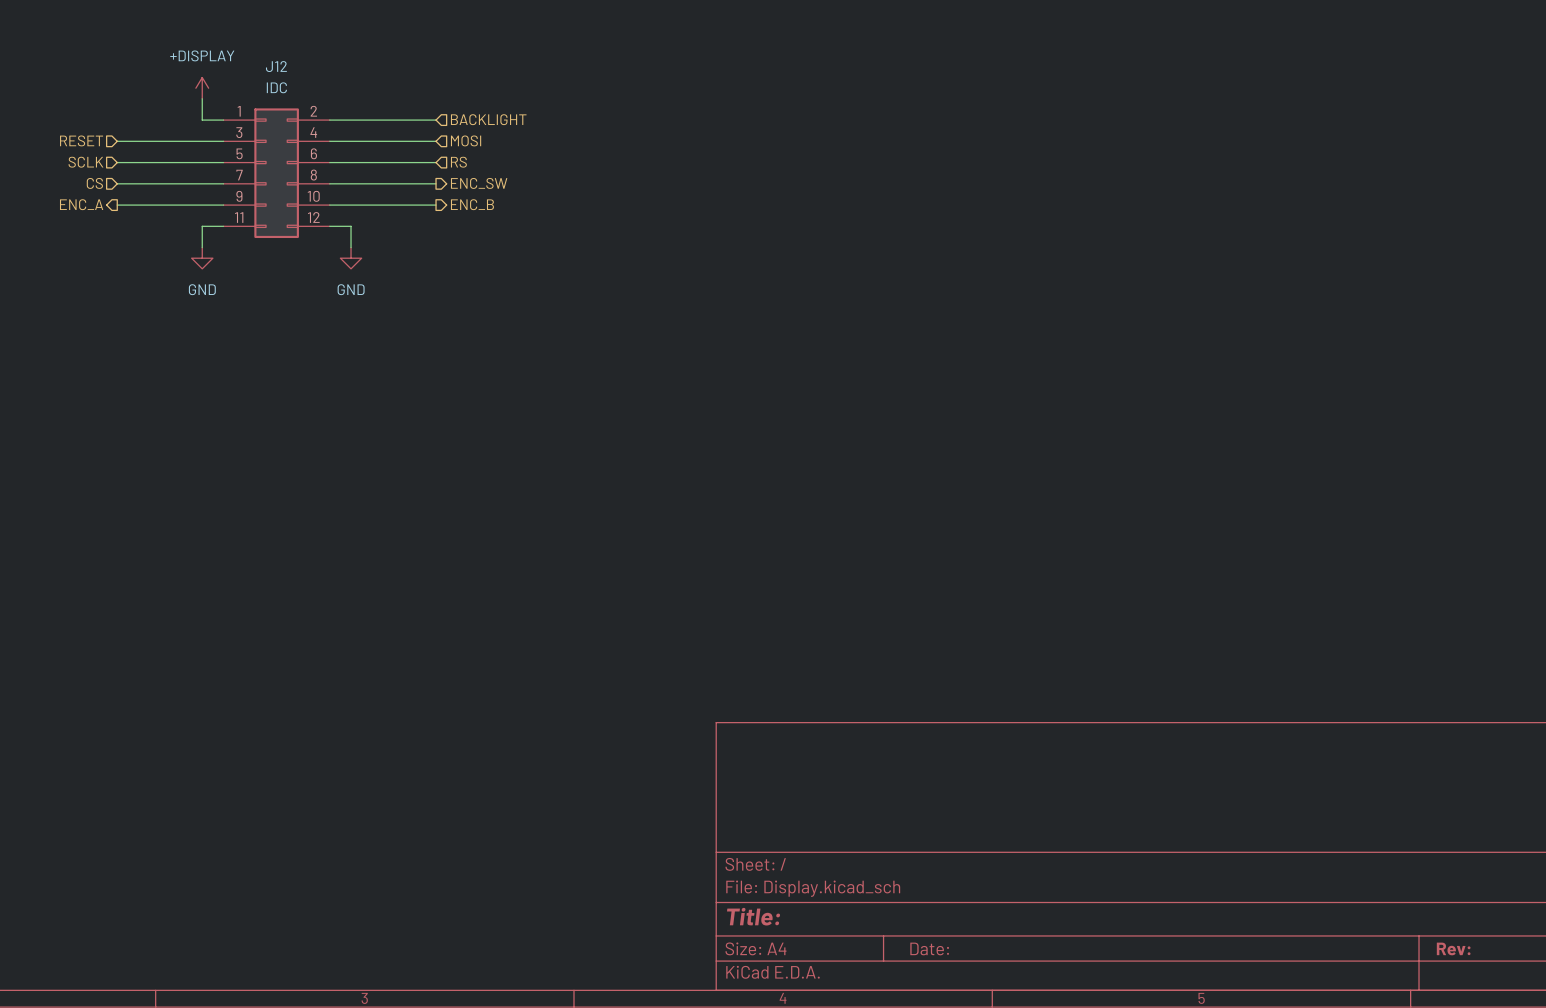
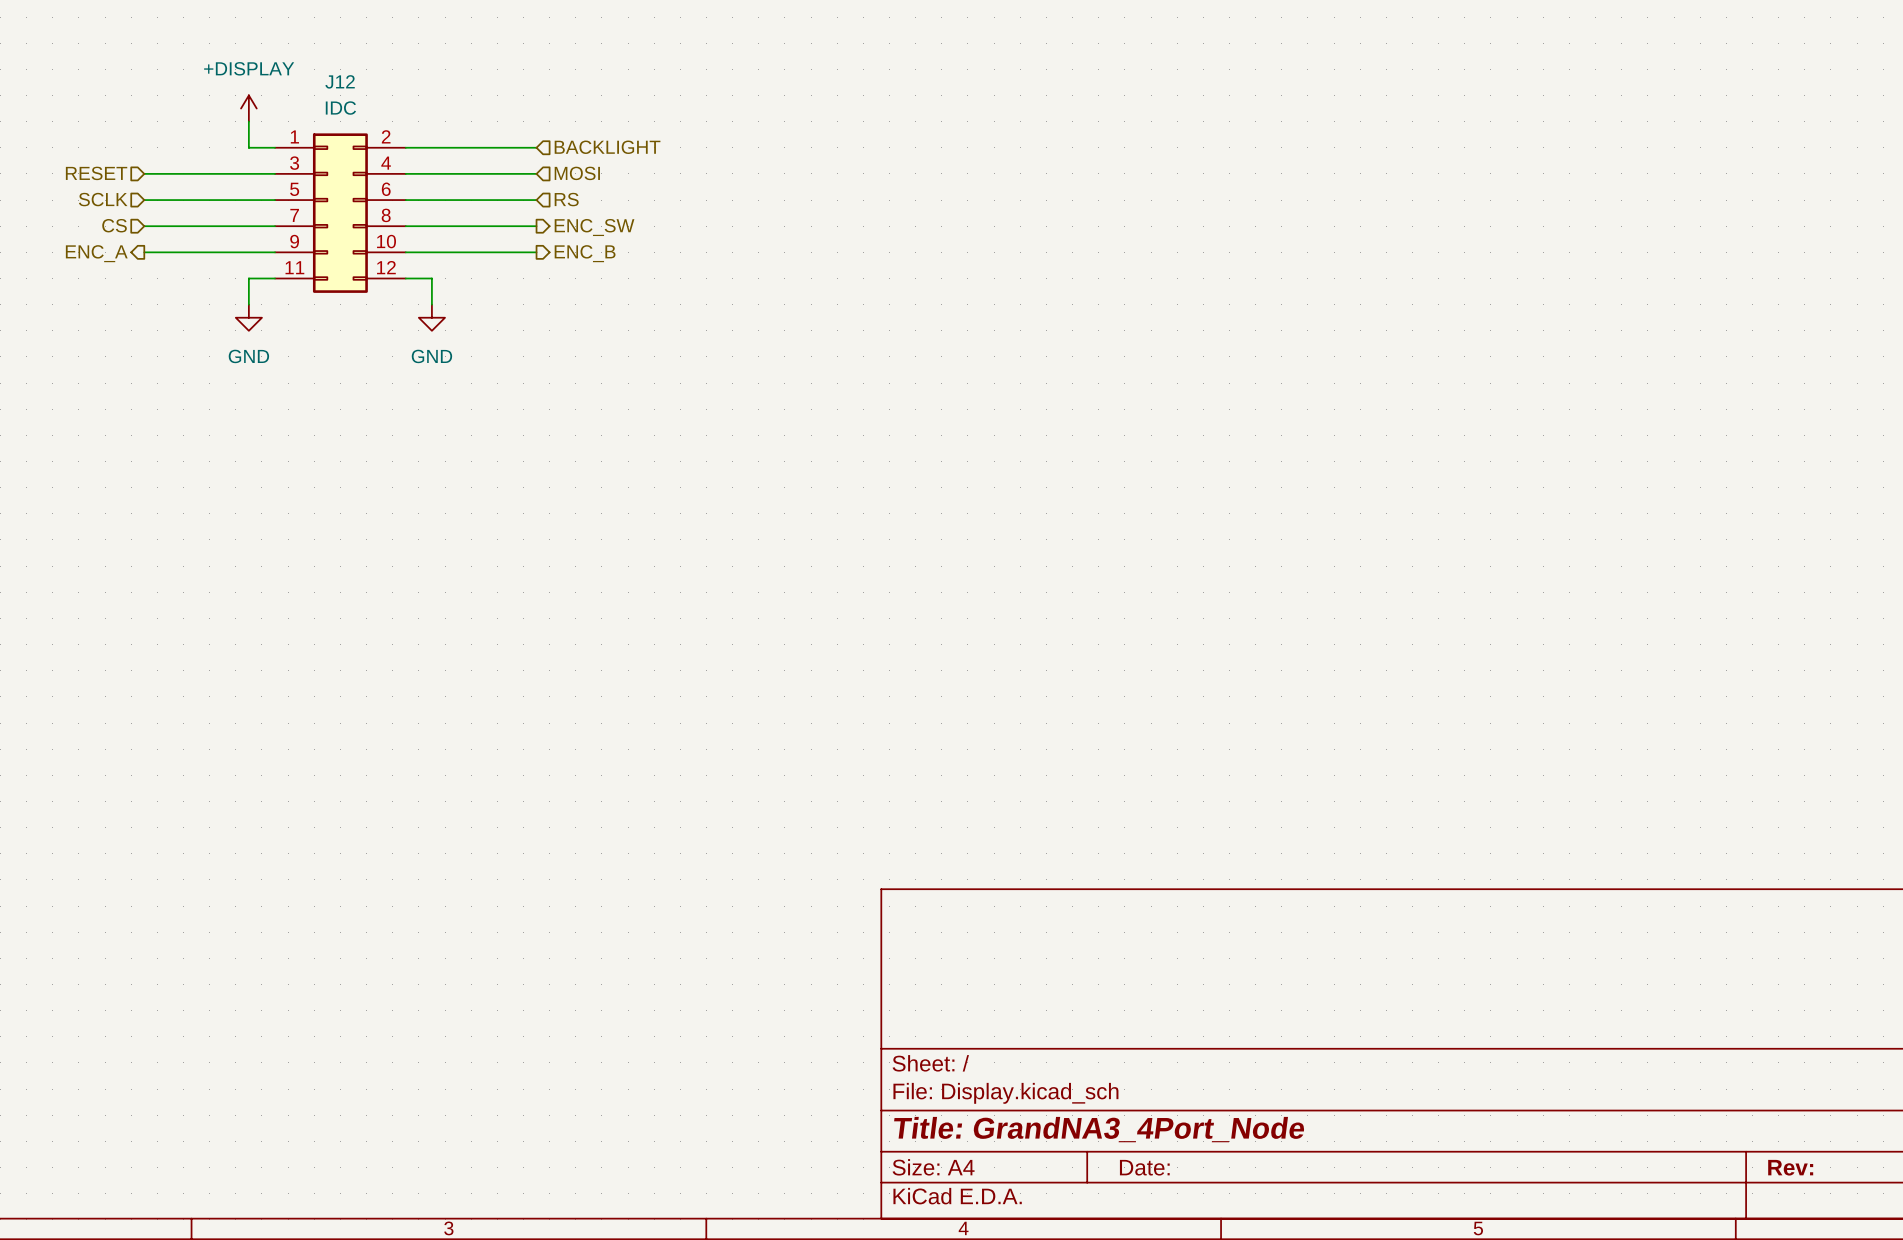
title block: Title: (753, 916) -> Title: GrandNA3_4Port_Node (1099, 1129)

